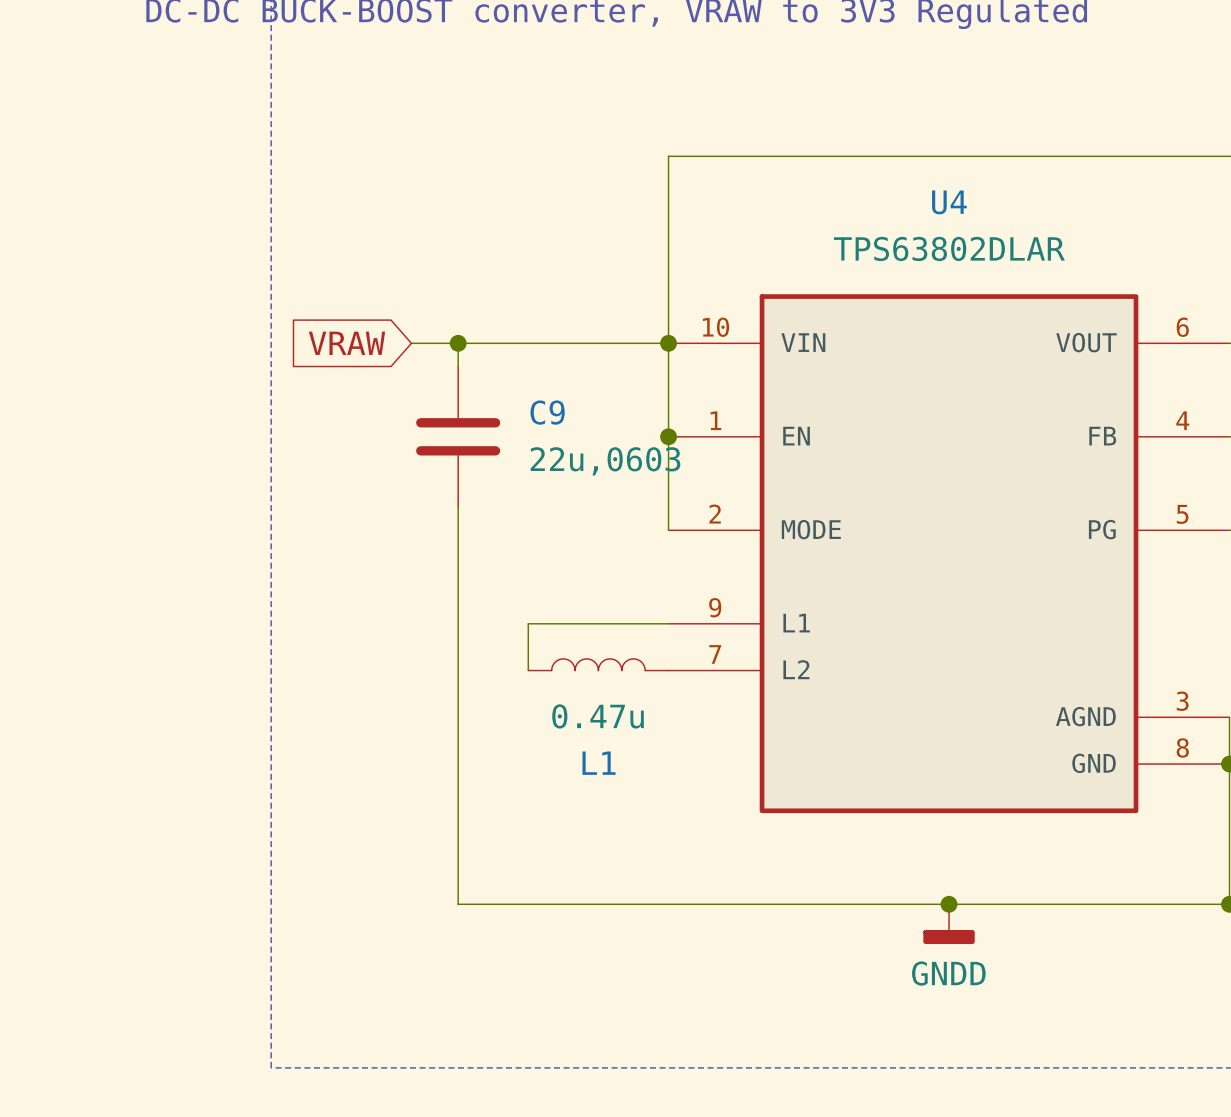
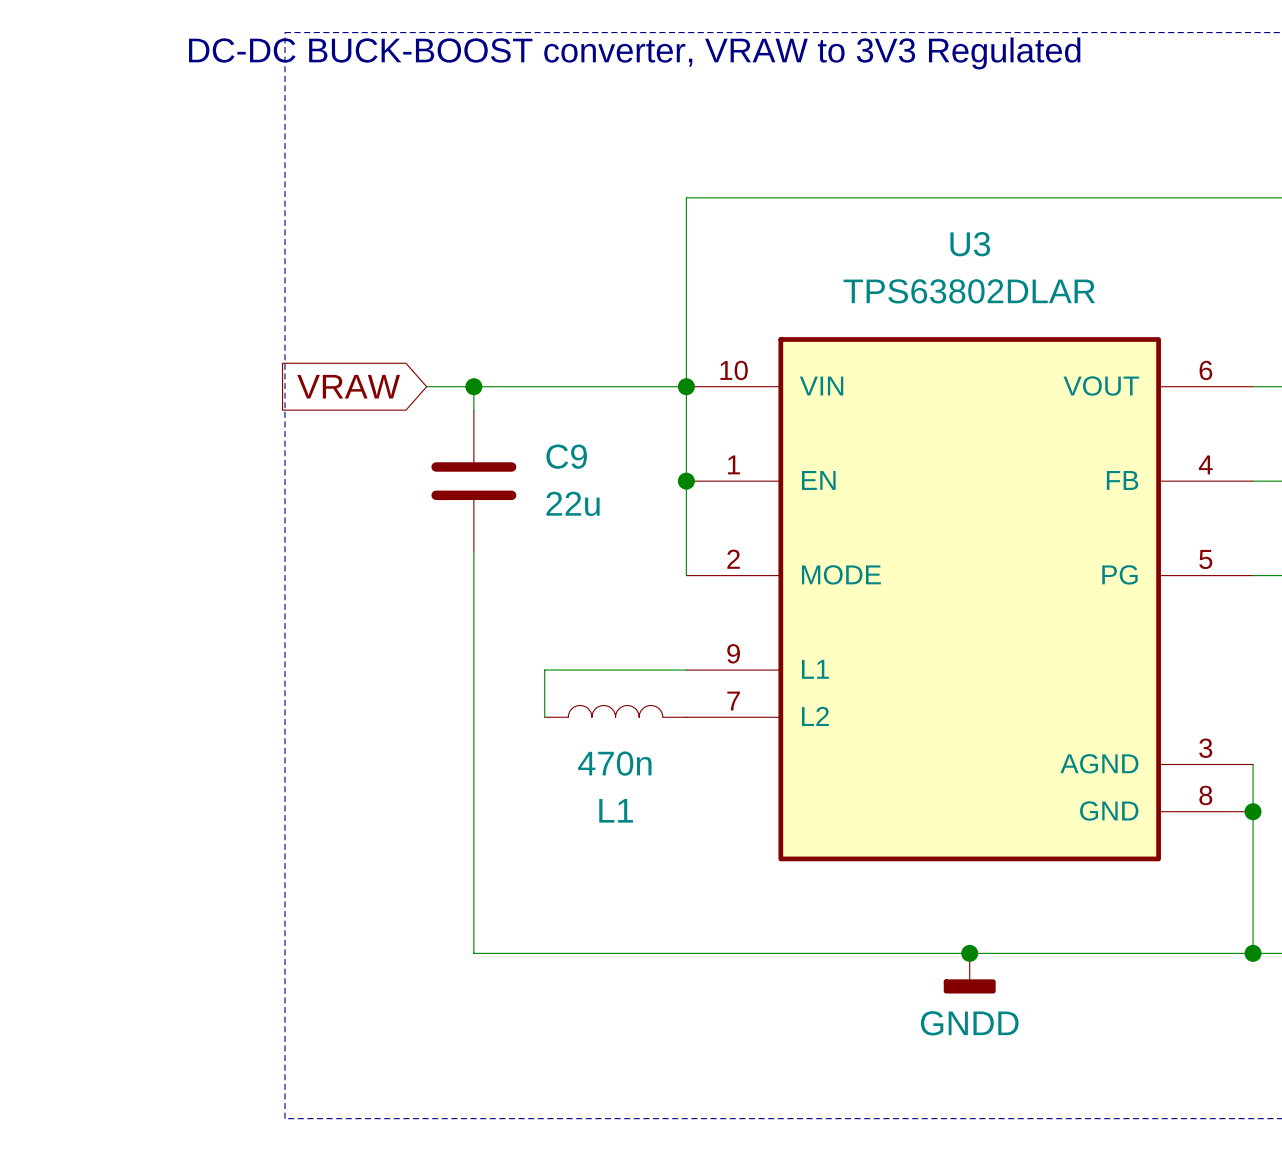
U4 name: U4 (949, 202) -> U3 (970, 244)
C9 value: 22u,0603 (605, 461) -> 22u (573, 503)
L1 value: 0.47u (598, 716) -> 470n (614, 763)

